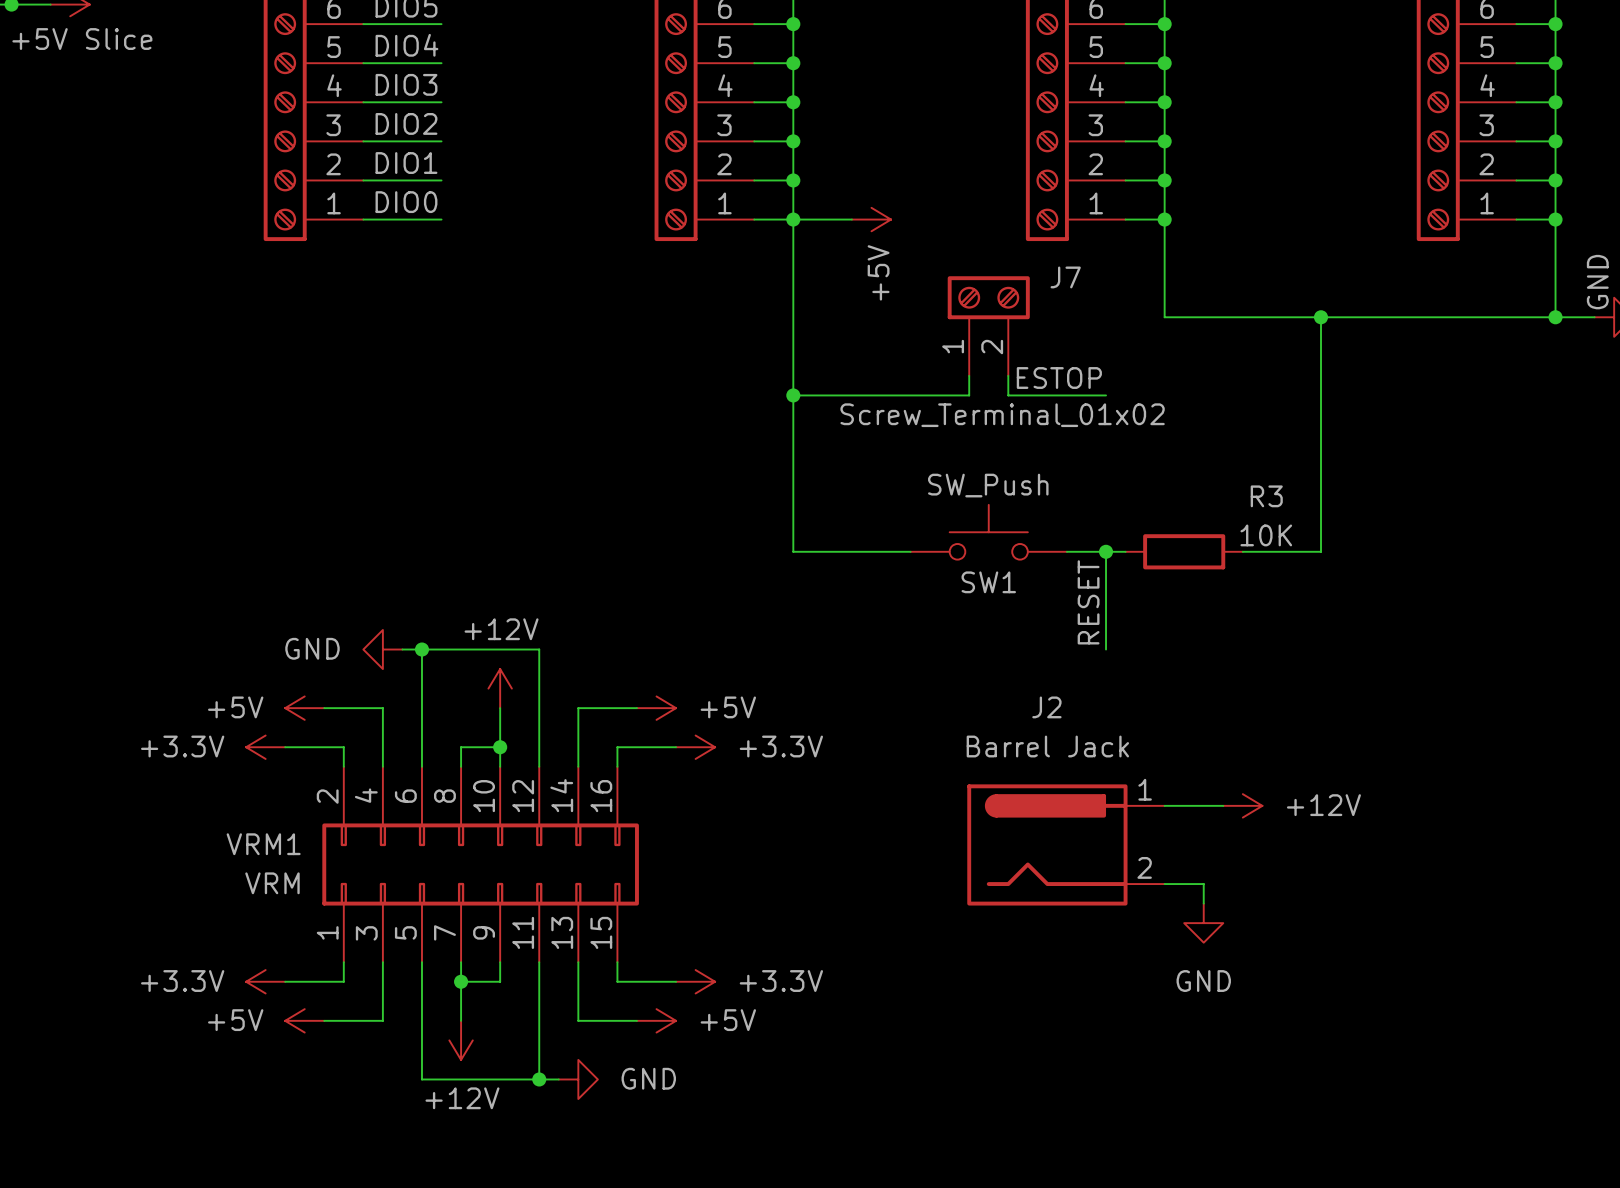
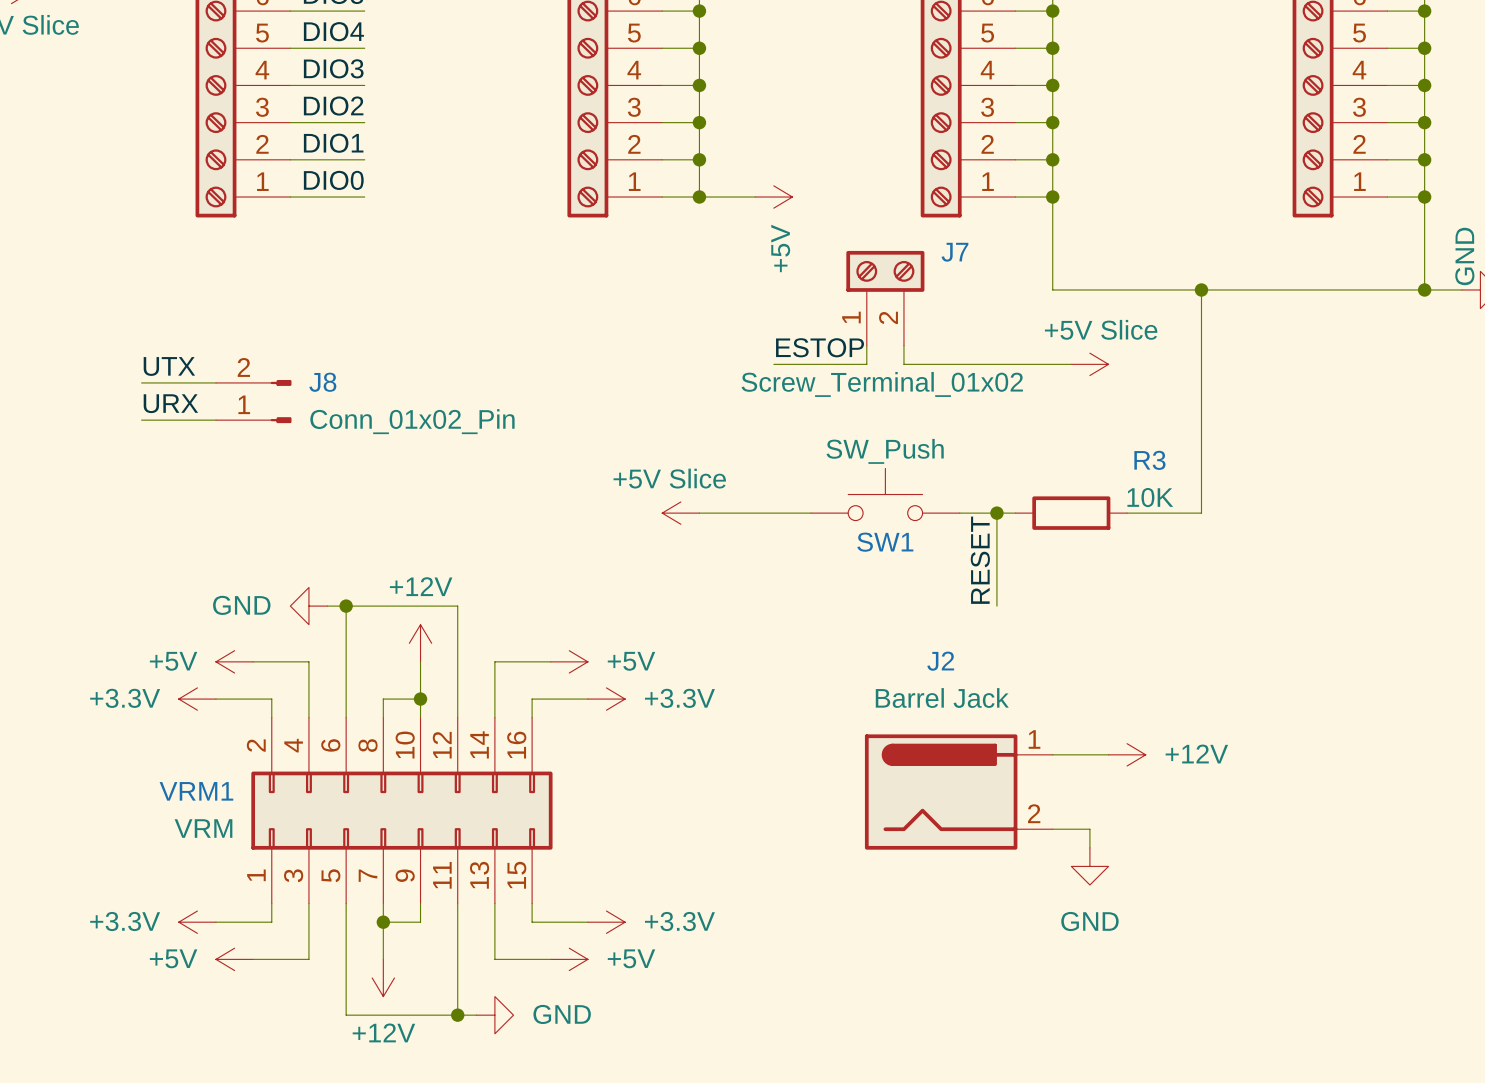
wire: (793, 219) (793, 551) -> none
label position: ESTOP (1059, 378) -> ESTOP (820, 347)
wire: (793, 395) (871, 395) -> (996, 364) (1071, 364)
junction: (793, 395) -> none
power symbol: none -> +5V Slice (1089, 364)
label: none -> UTX (169, 366)
wire: none -> (141, 382) (215, 382)
J8: none -> Conn_01x02_Pin (253, 401)
label: none -> URX (170, 403)
wire: none -> (141, 420) (215, 420)
power symbol: none -> +5V Slice (680, 513)

